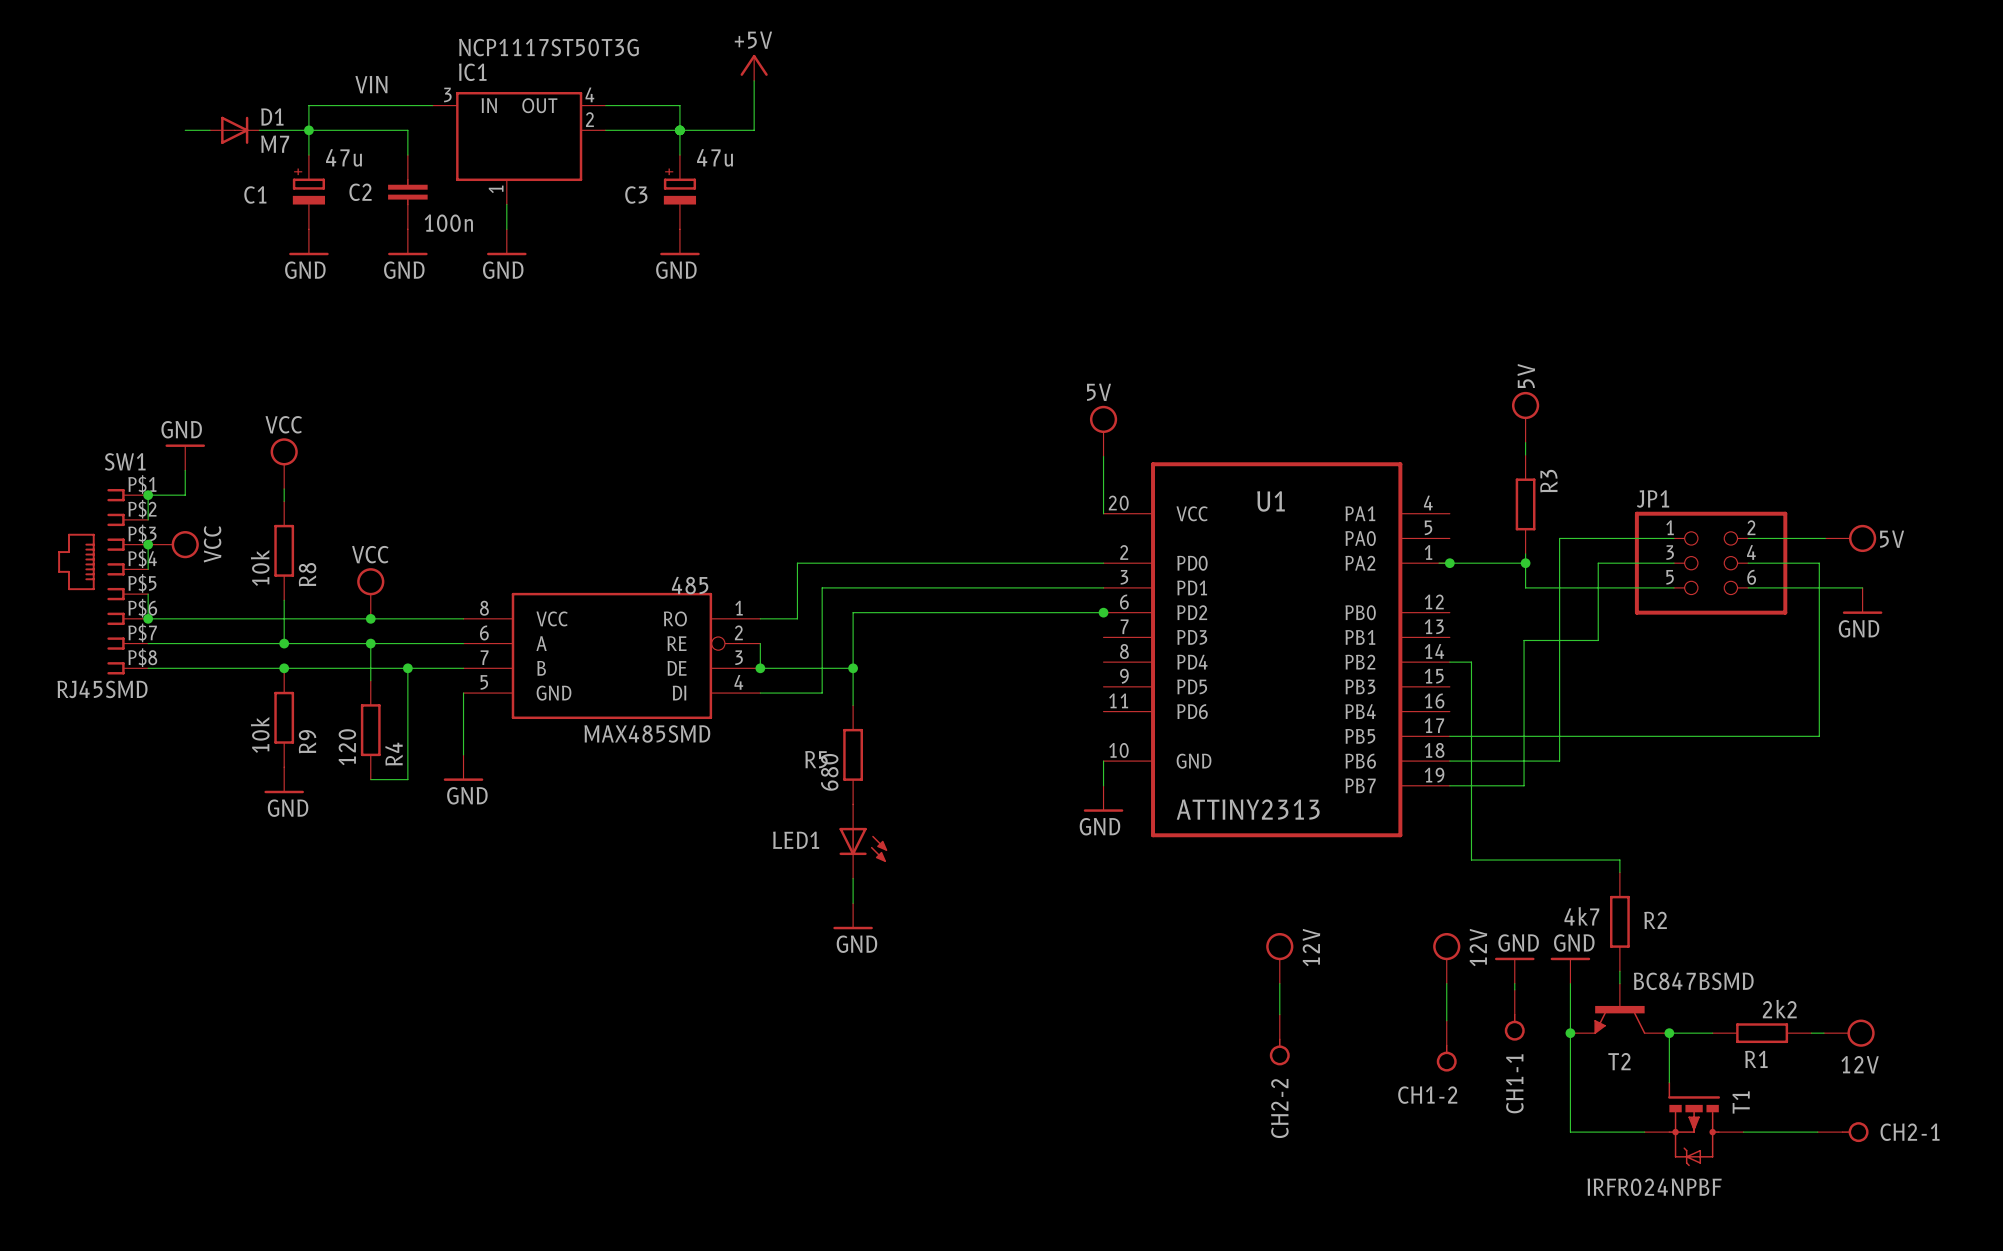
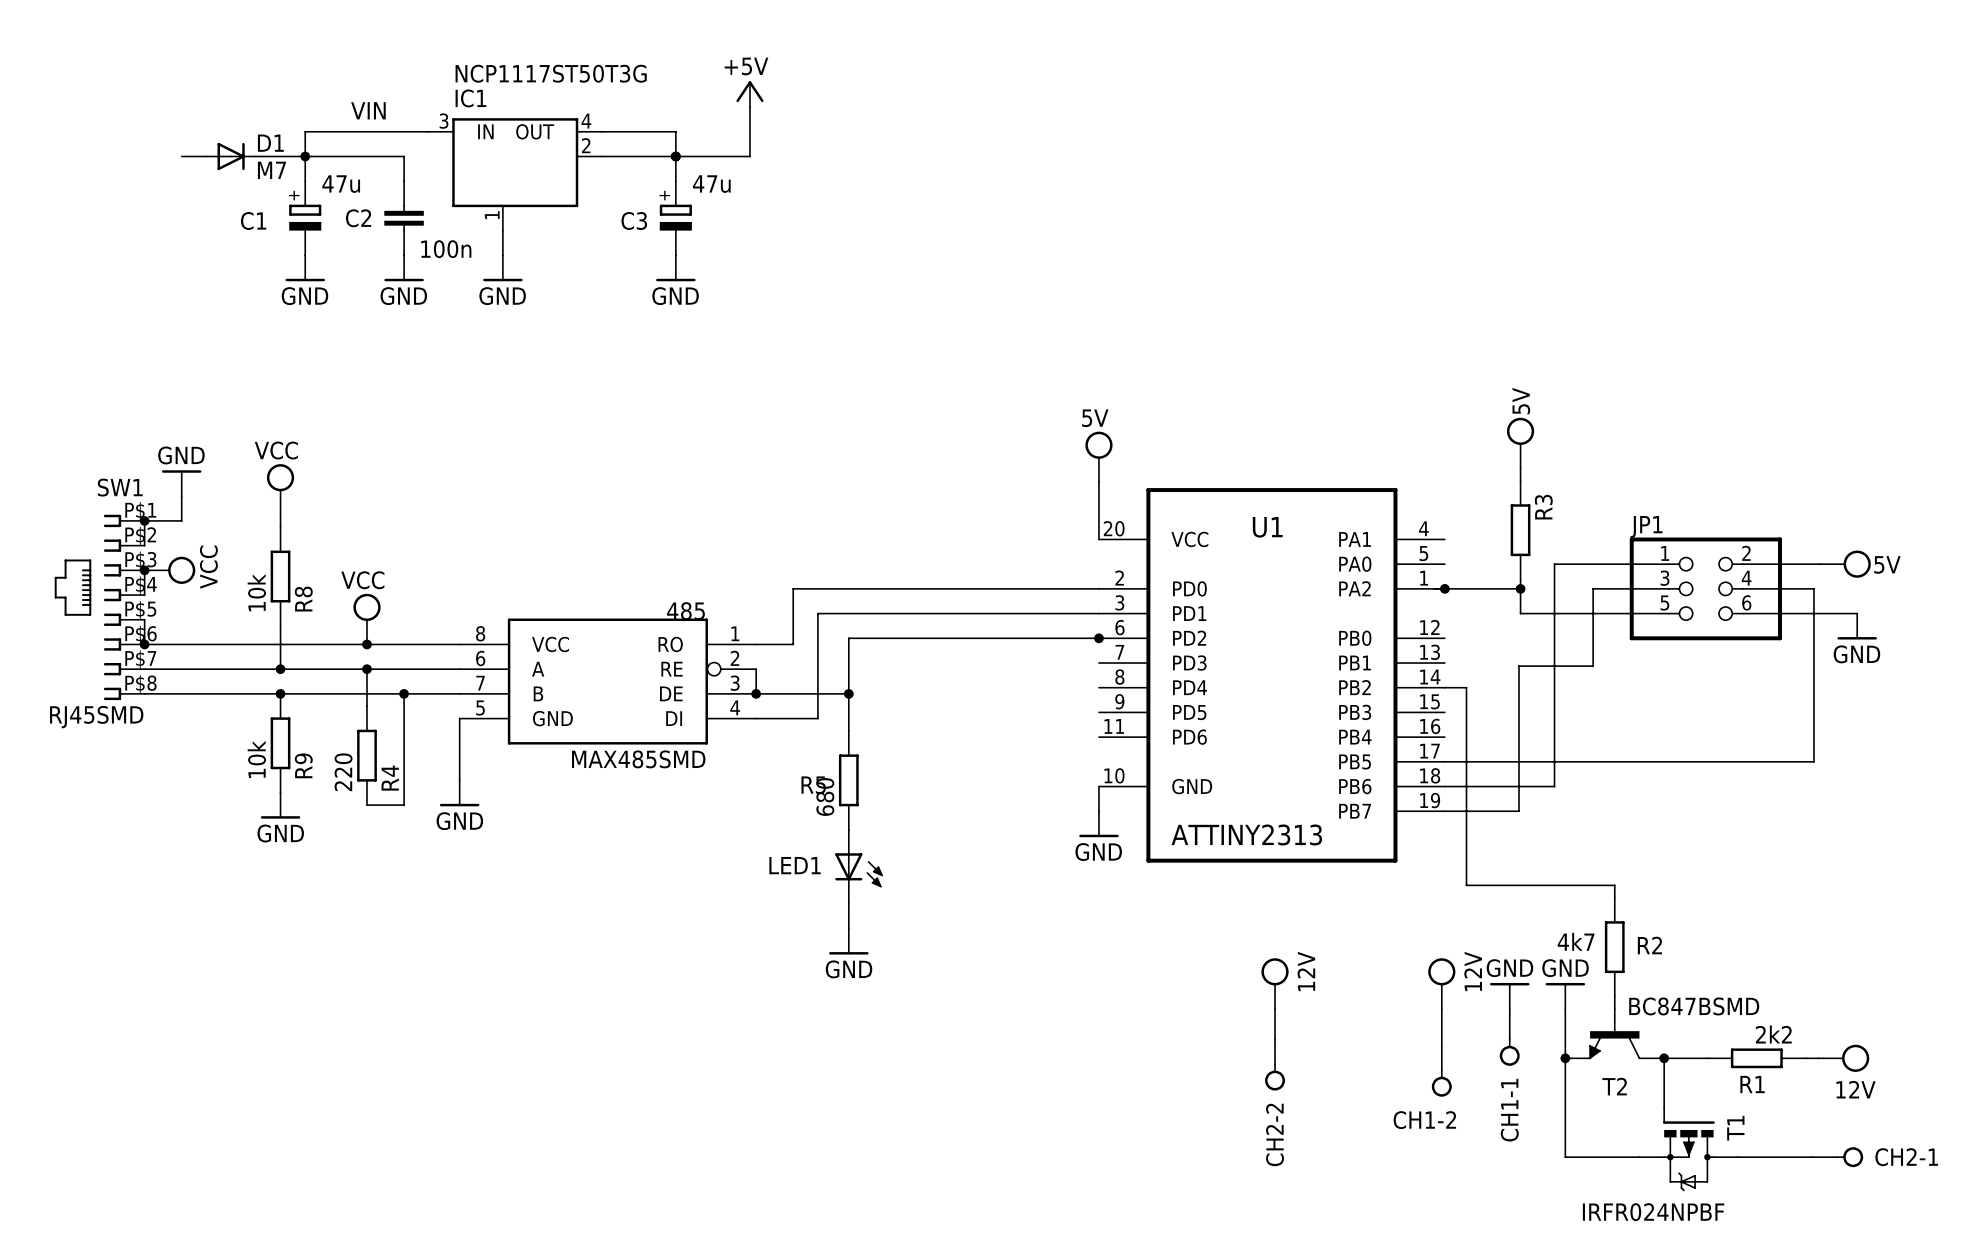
R4 value: 120 (347, 747) -> 220 (343, 772)

